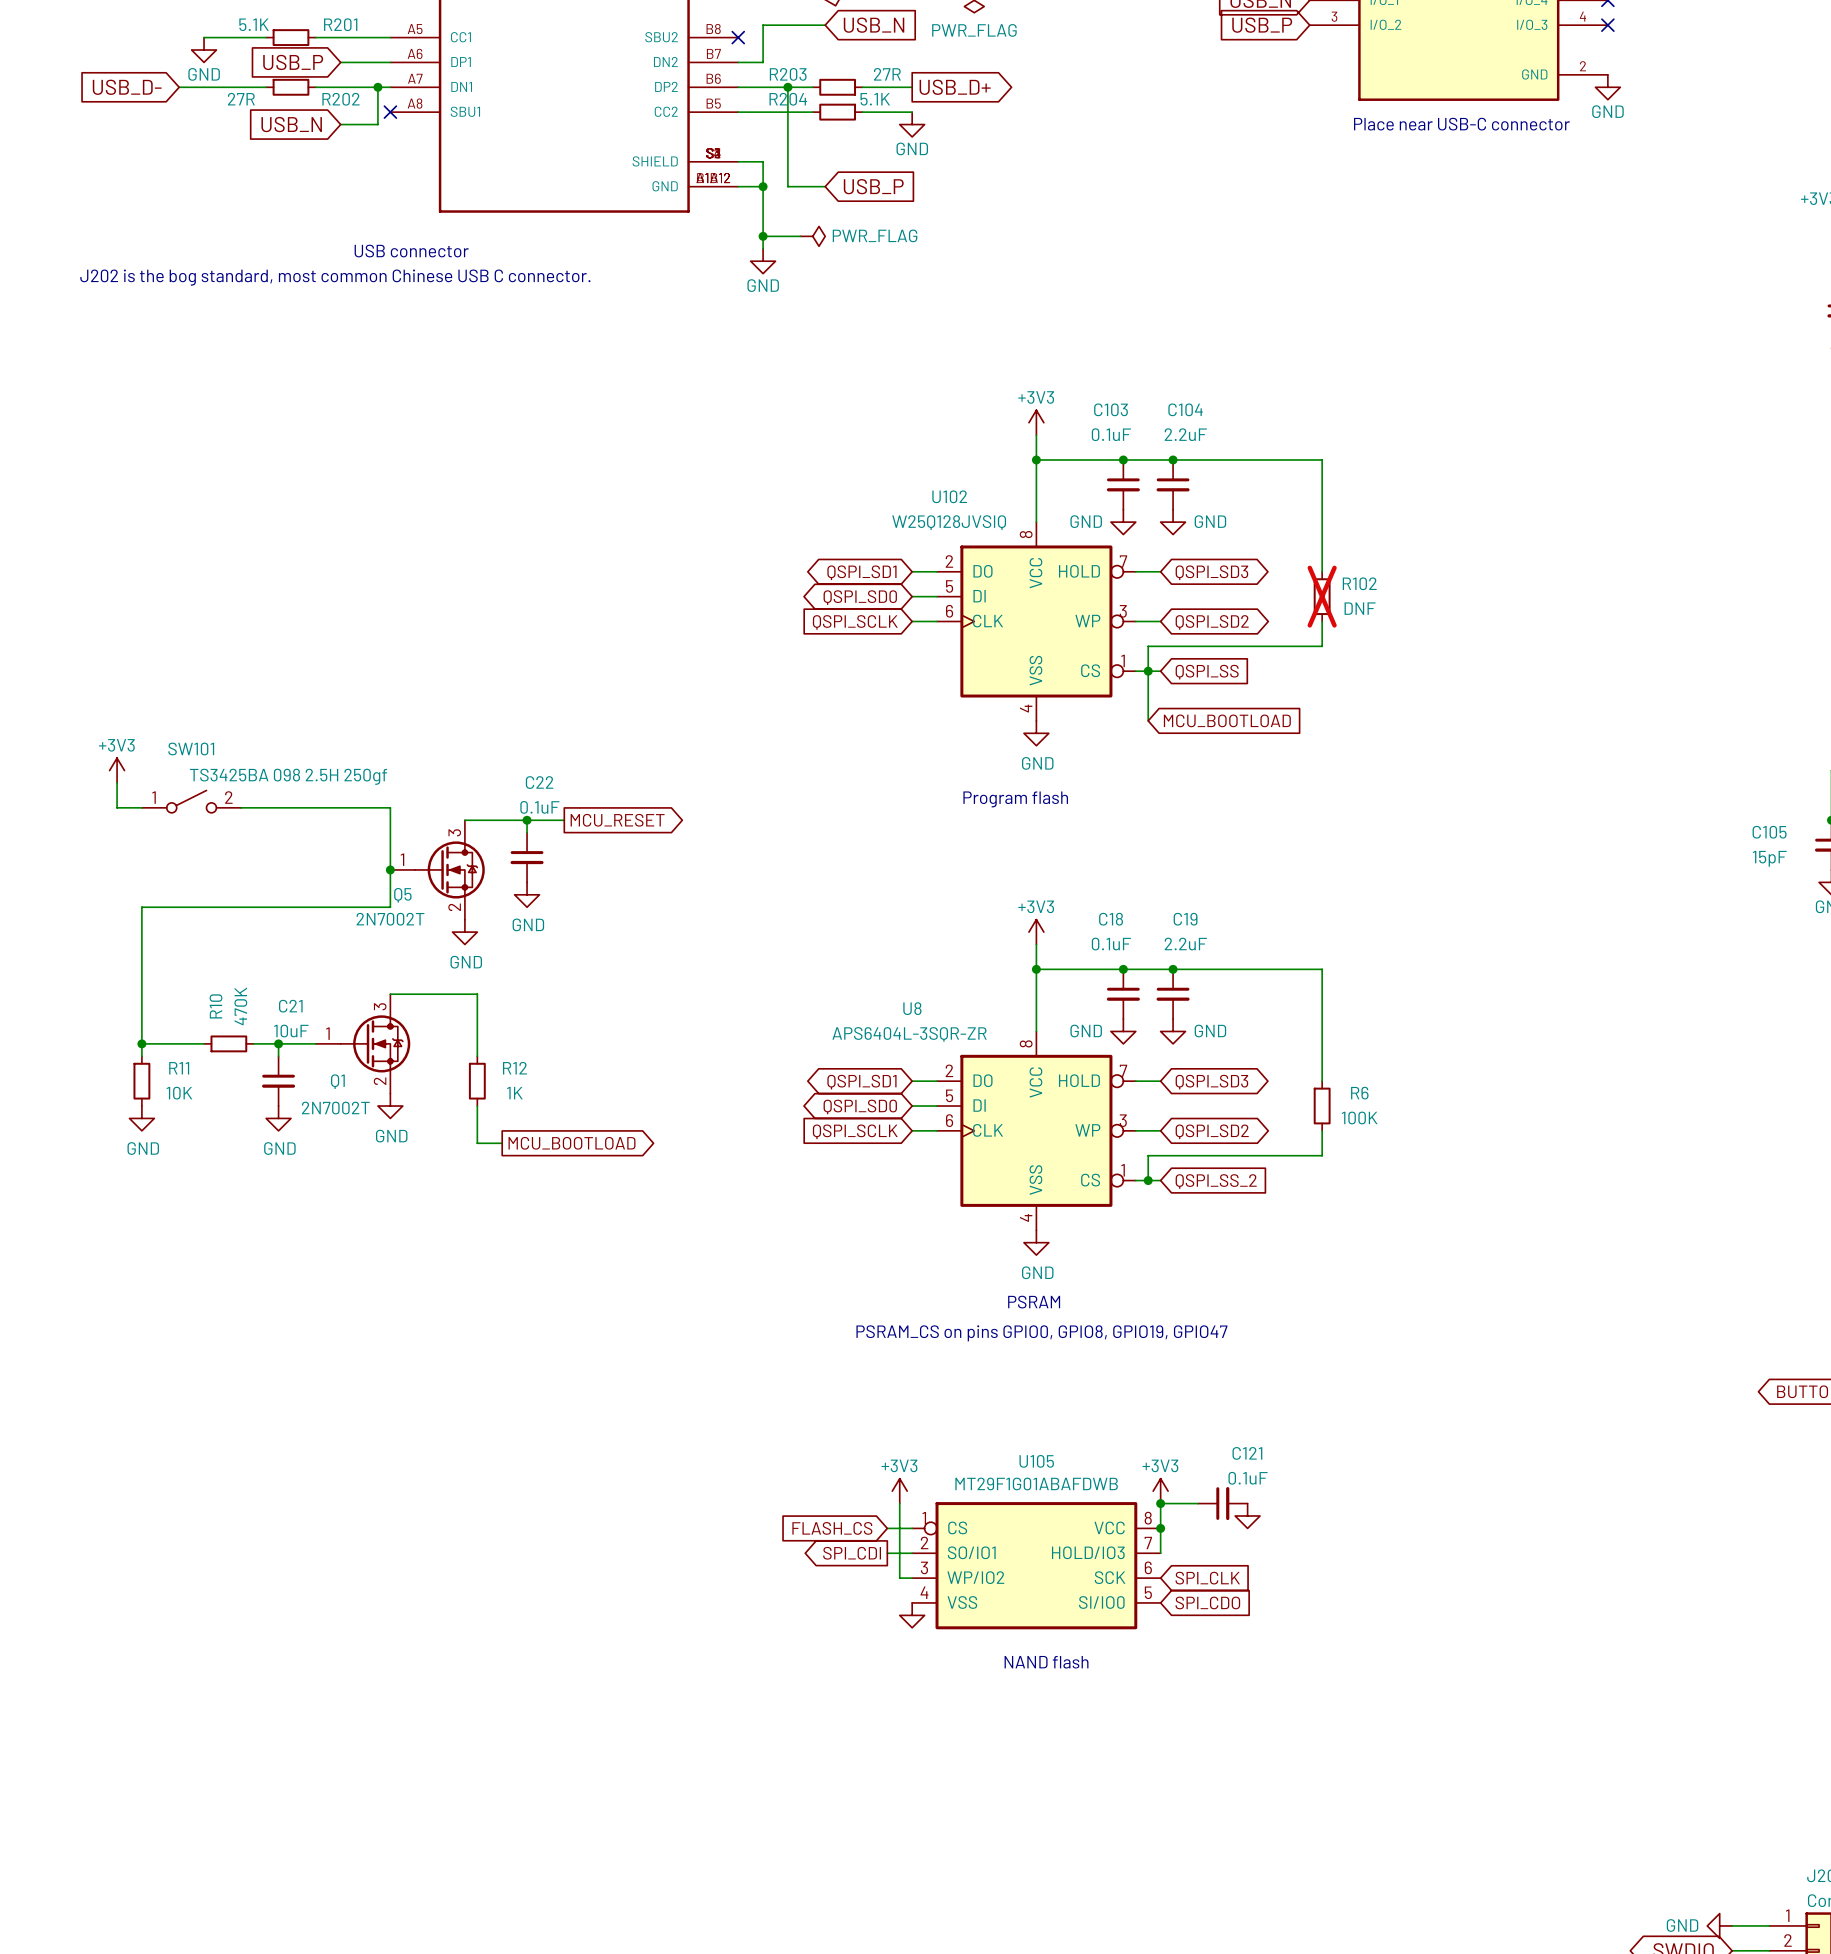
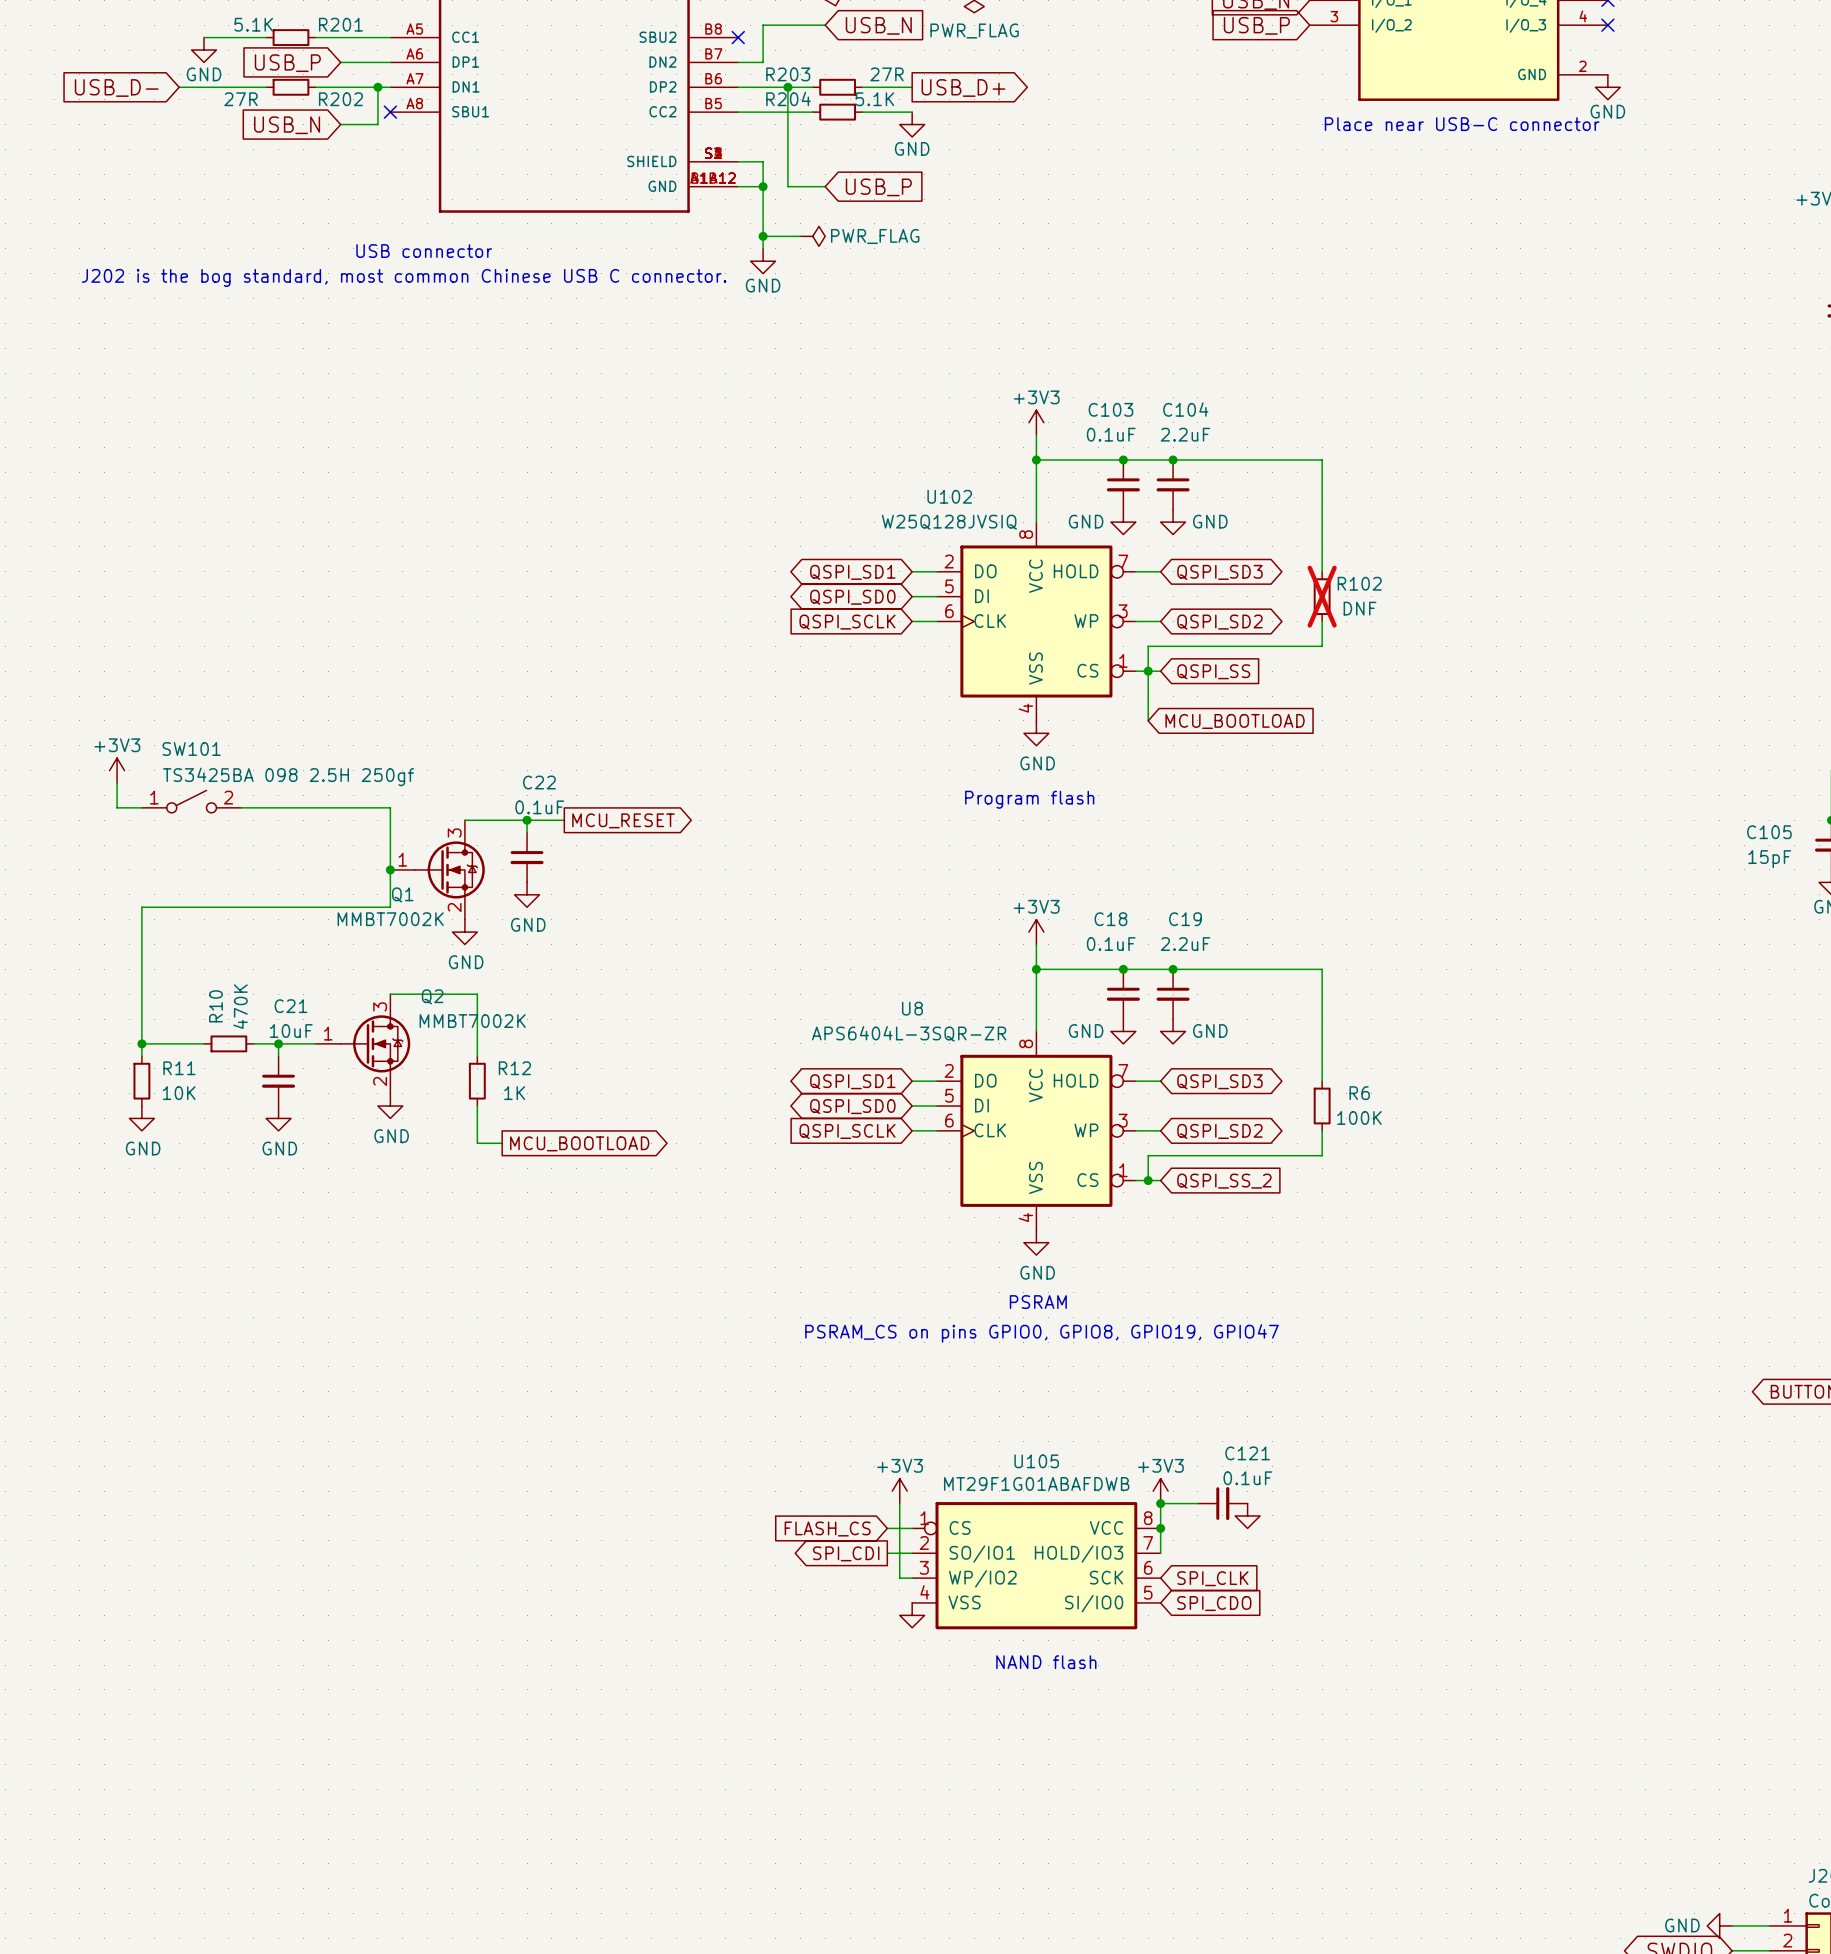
Q5 name: Q5 (402, 895) -> Q1 (402, 894)
Q5 value: 2N7002T (390, 919) -> MMBT7002K (390, 919)
Q1 name: Q1 (337, 1081) -> Q2 (432, 996)
Q1 value: 2N7002T (335, 1108) -> MMBT7002K (472, 1021)

